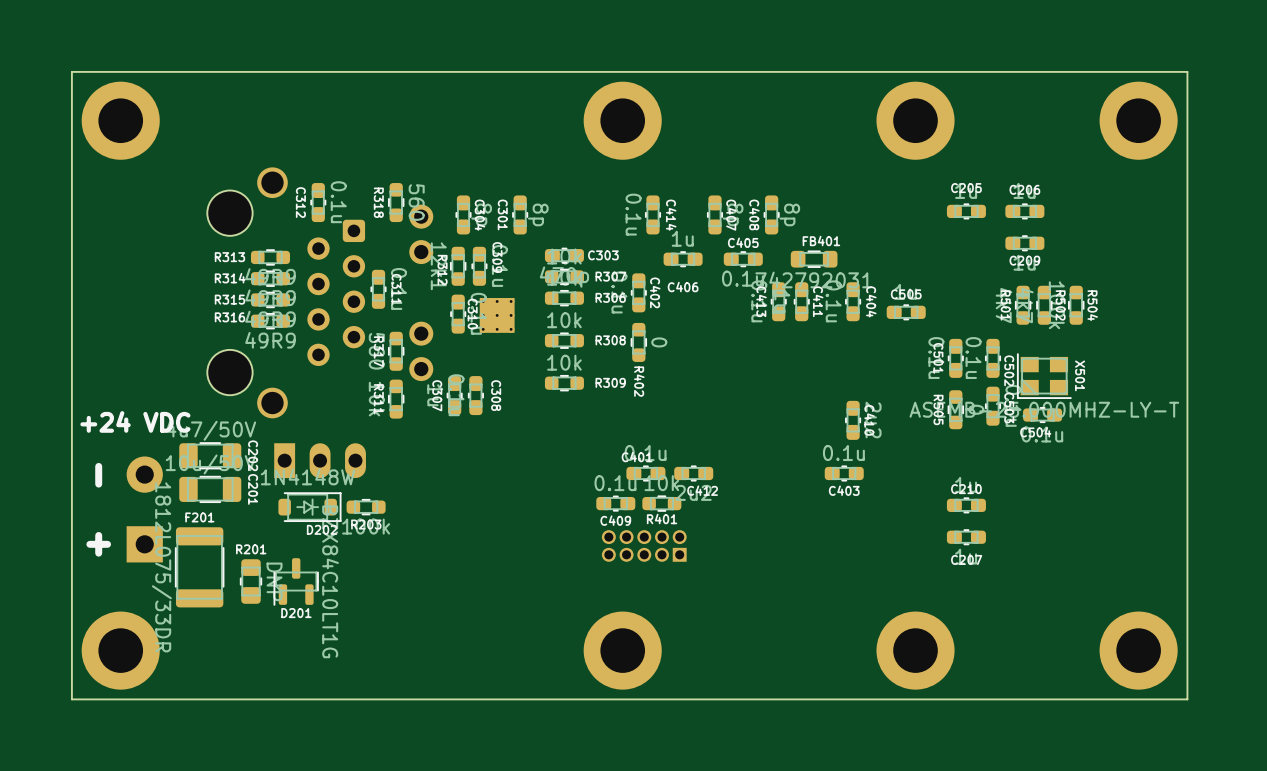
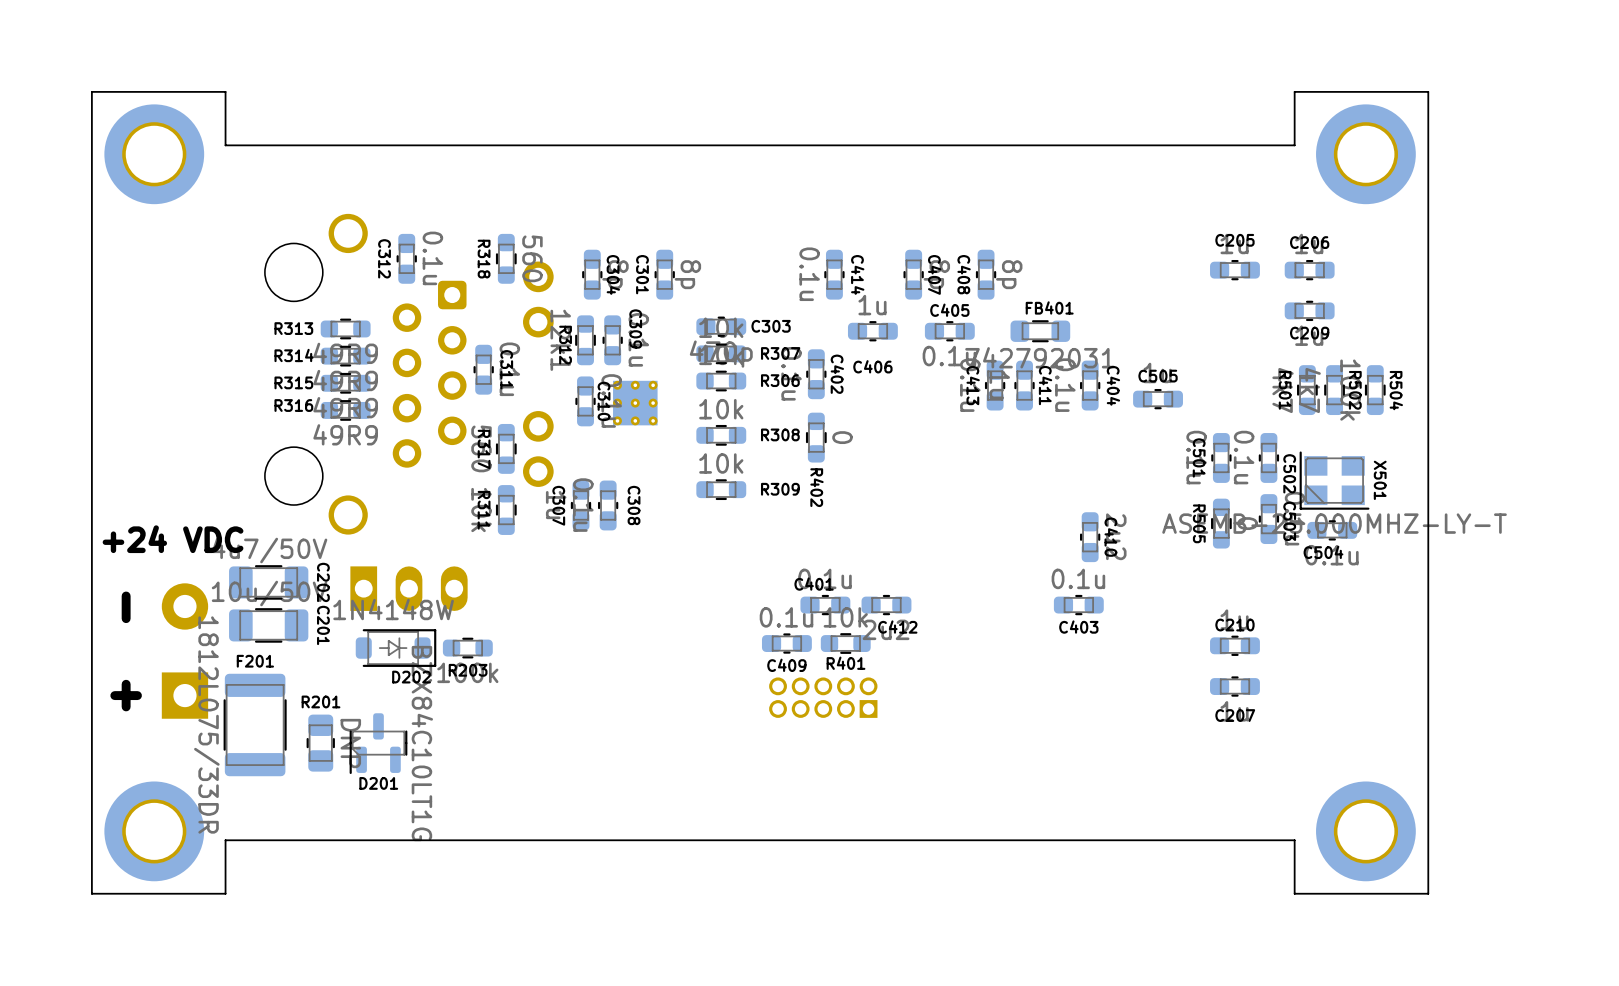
board edge: (1013, 71) (176, 71) -> (1294, 91) (1294, 145) (225, 145) (225, 91)
board edge: (1117, 71) (1187, 71) (1187, 699) (1117, 699) -> (1428, 91) (1428, 893)
part: (622, 120) -> none
part: (915, 120) -> none
part position: (1138, 120) -> (1365, 154)
part: (622, 650) -> none
part: (915, 650) -> none
part position: (1138, 650) -> (1365, 831)
board edge: (1013, 699) (176, 699) -> (1294, 893) (1294, 840) (225, 840) (225, 893)

